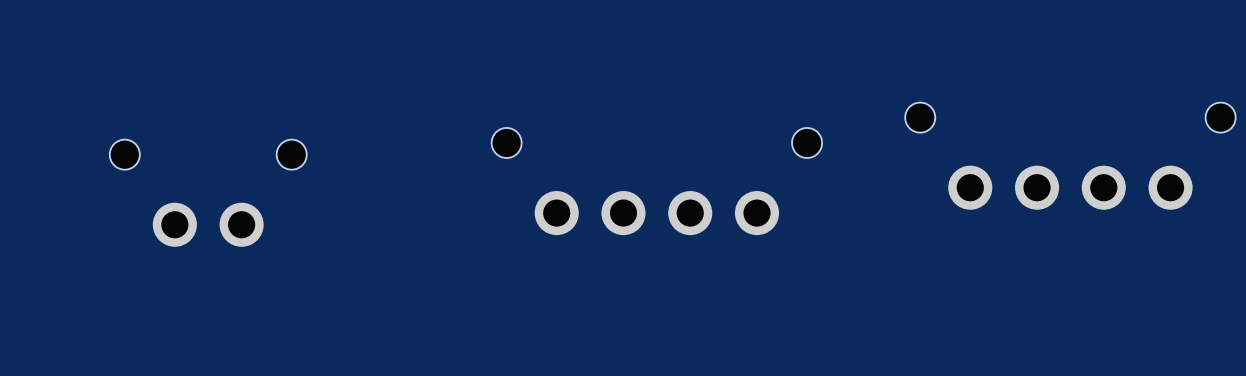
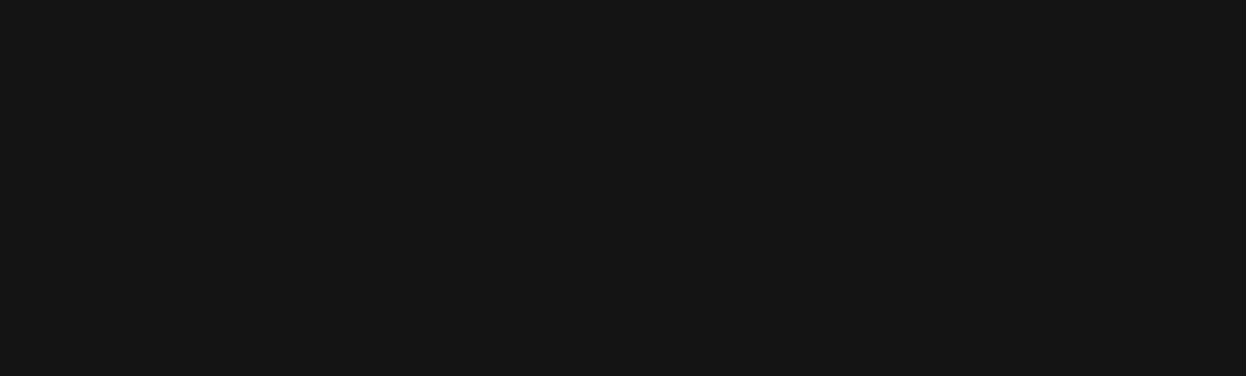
part: (1070, 156) -> none
part: (656, 181) -> none
part: (208, 193) -> none

